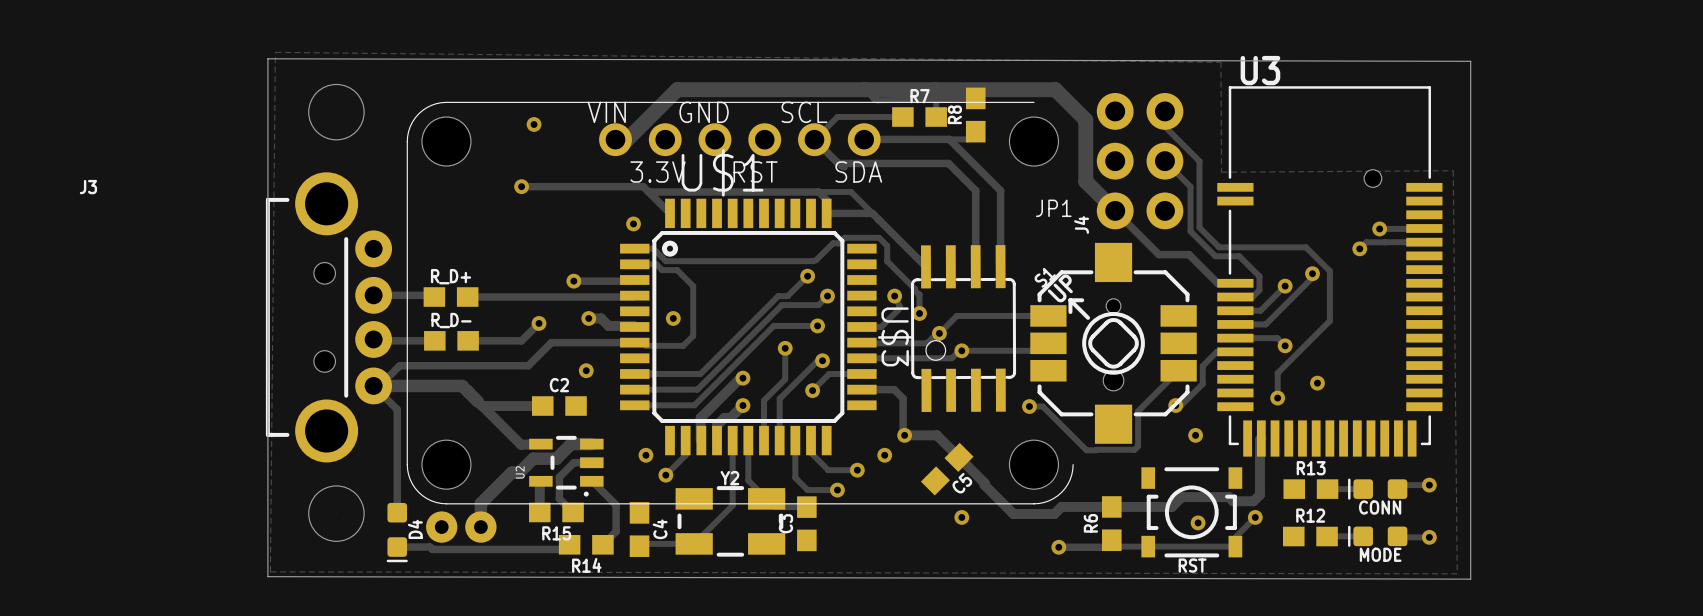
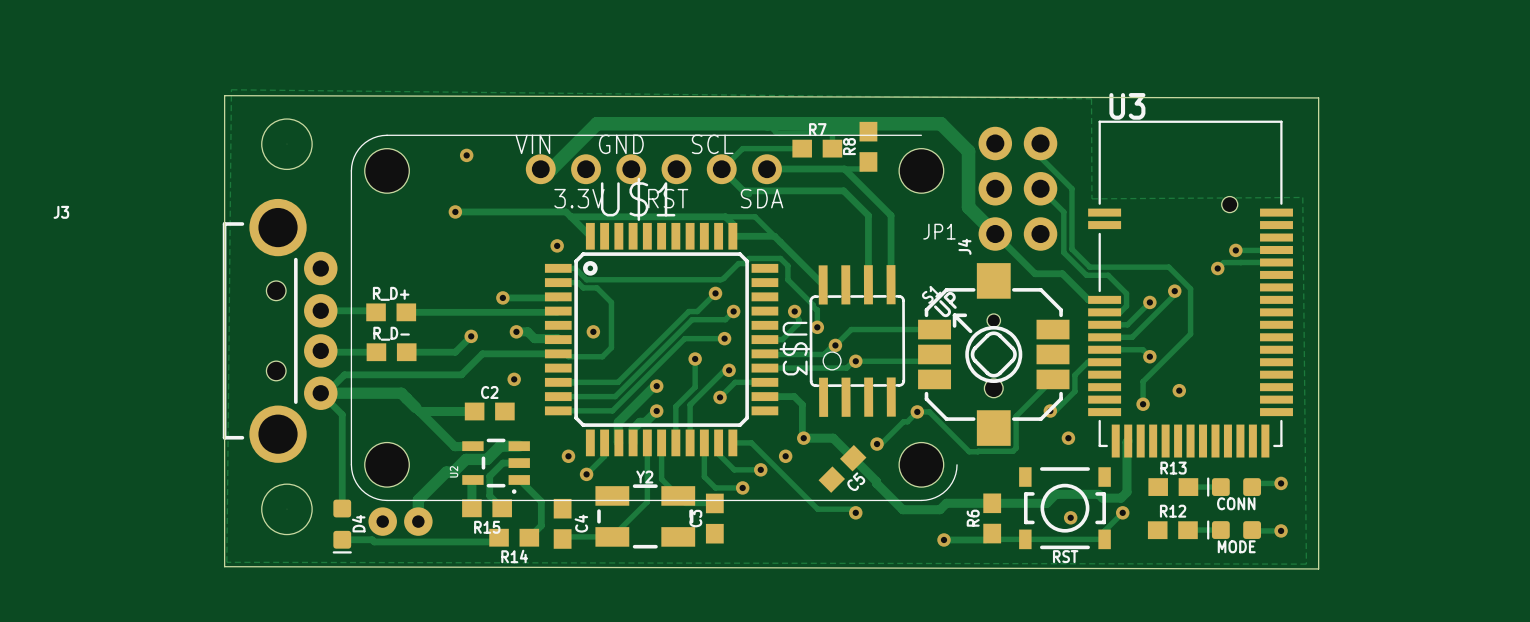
track: none -> (917, 411) (907, 421) (903, 421) (881, 444) (877, 444)
track: none -> (732, 442) (751, 442) (817, 509) (855, 509)
via: none -> (877, 444)

